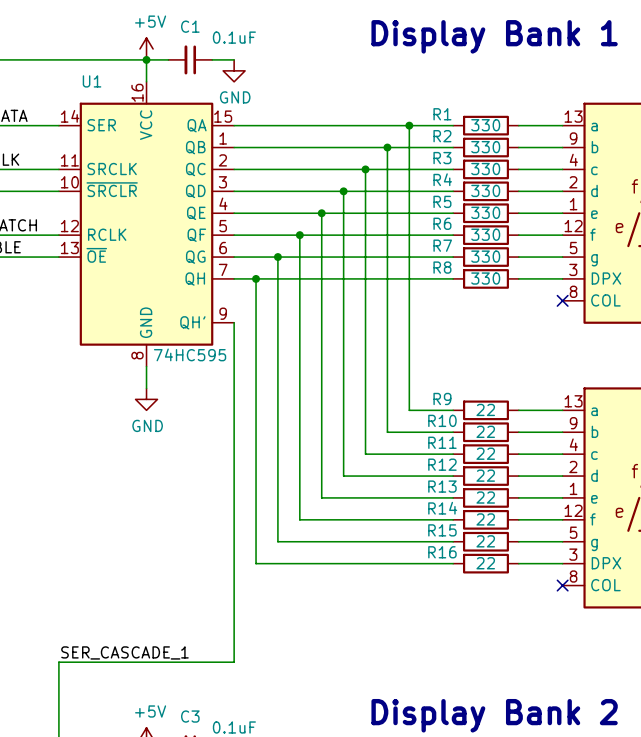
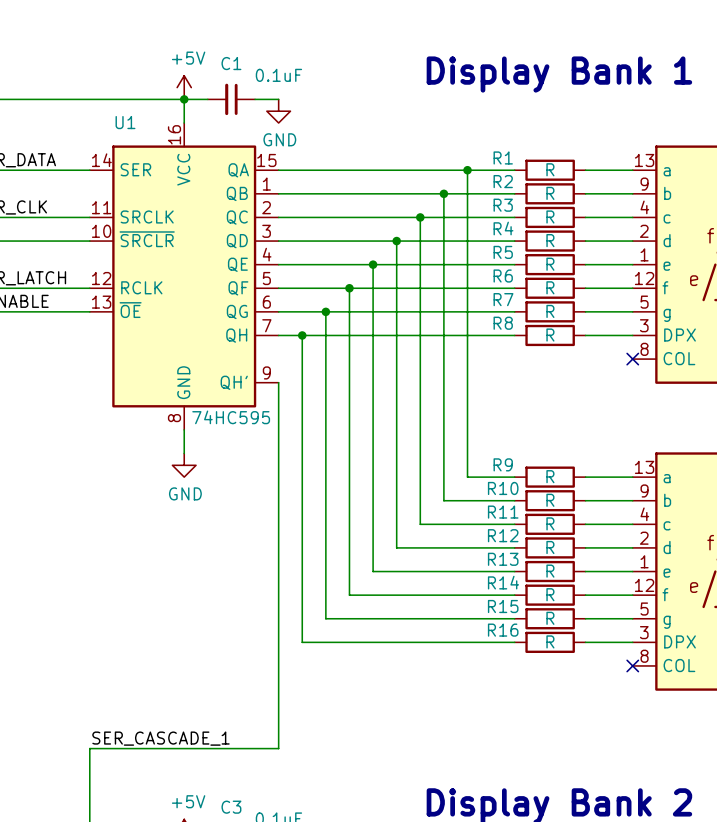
R1 value: 330 (485, 125) -> R (550, 169)
R2 value: 330 (485, 147) -> R (550, 193)
R3 value: 330 (485, 169) -> R (550, 216)
R4 value: 330 (485, 190) -> R (550, 240)
R5 value: 330 (485, 212) -> R (550, 264)
R6 value: 330 (485, 234) -> R (550, 287)
R7 value: 330 (485, 256) -> R (550, 311)
R8 value: 330 (485, 278) -> R (550, 335)
R9 value: 22 (485, 409) -> R (550, 476)
R10 value: 22 (485, 431) -> R (550, 500)
R11 value: 22 (485, 453) -> R (550, 523)
R12 value: 22 (485, 475) -> R (550, 547)
R13 value: 22 (485, 497) -> R (550, 571)
R14 value: 22 (485, 519) -> R (550, 594)
R15 value: 22 (485, 541) -> R (550, 618)
R16 value: 22 (485, 563) -> R (550, 641)

